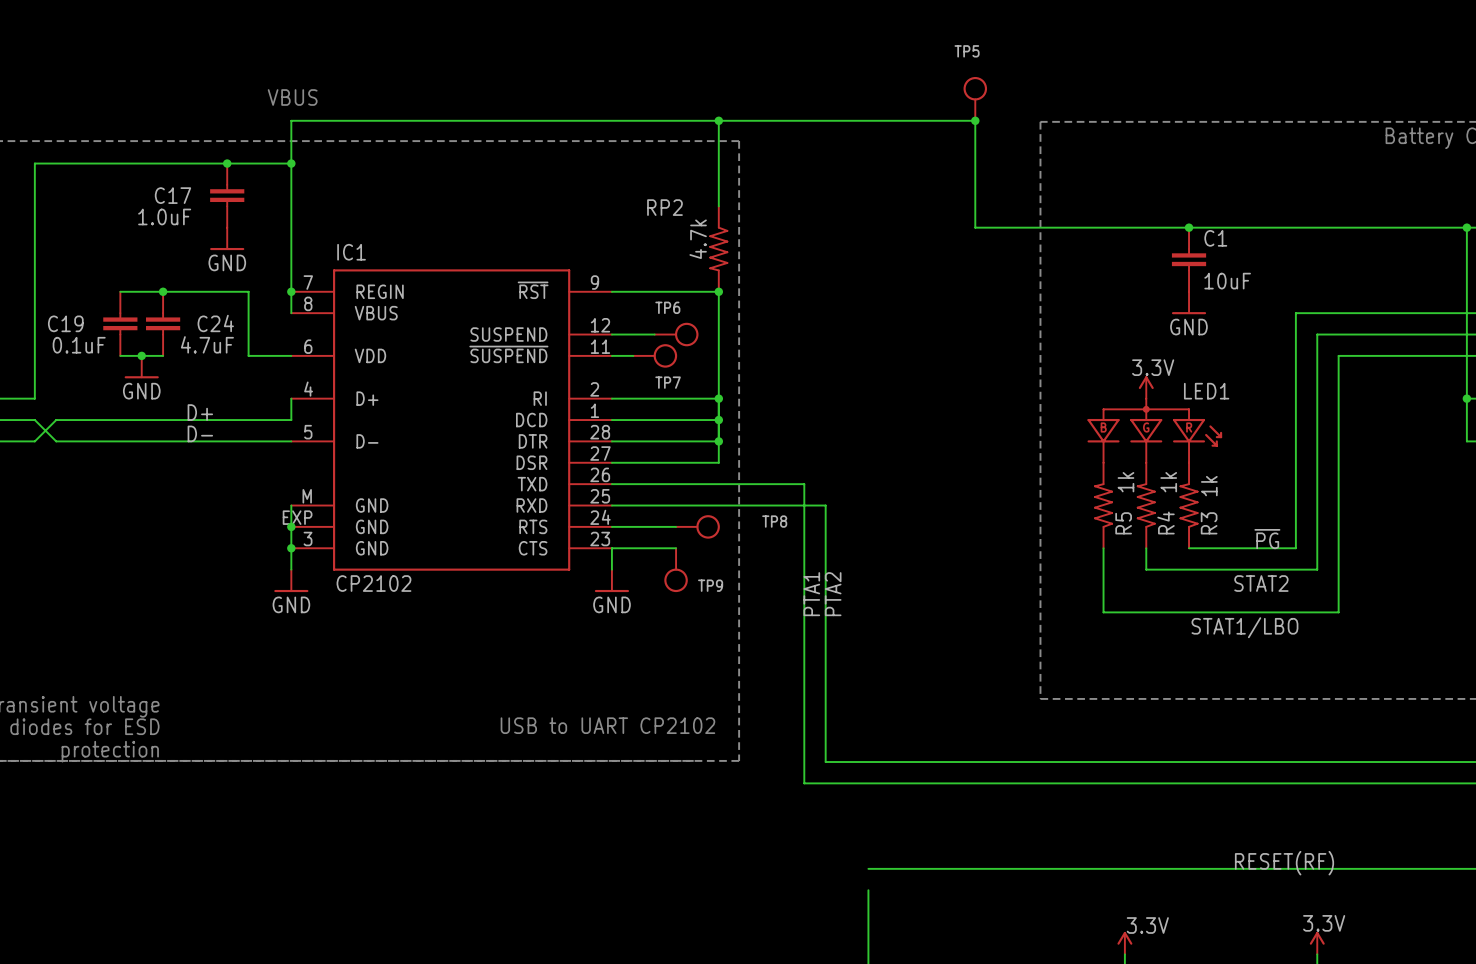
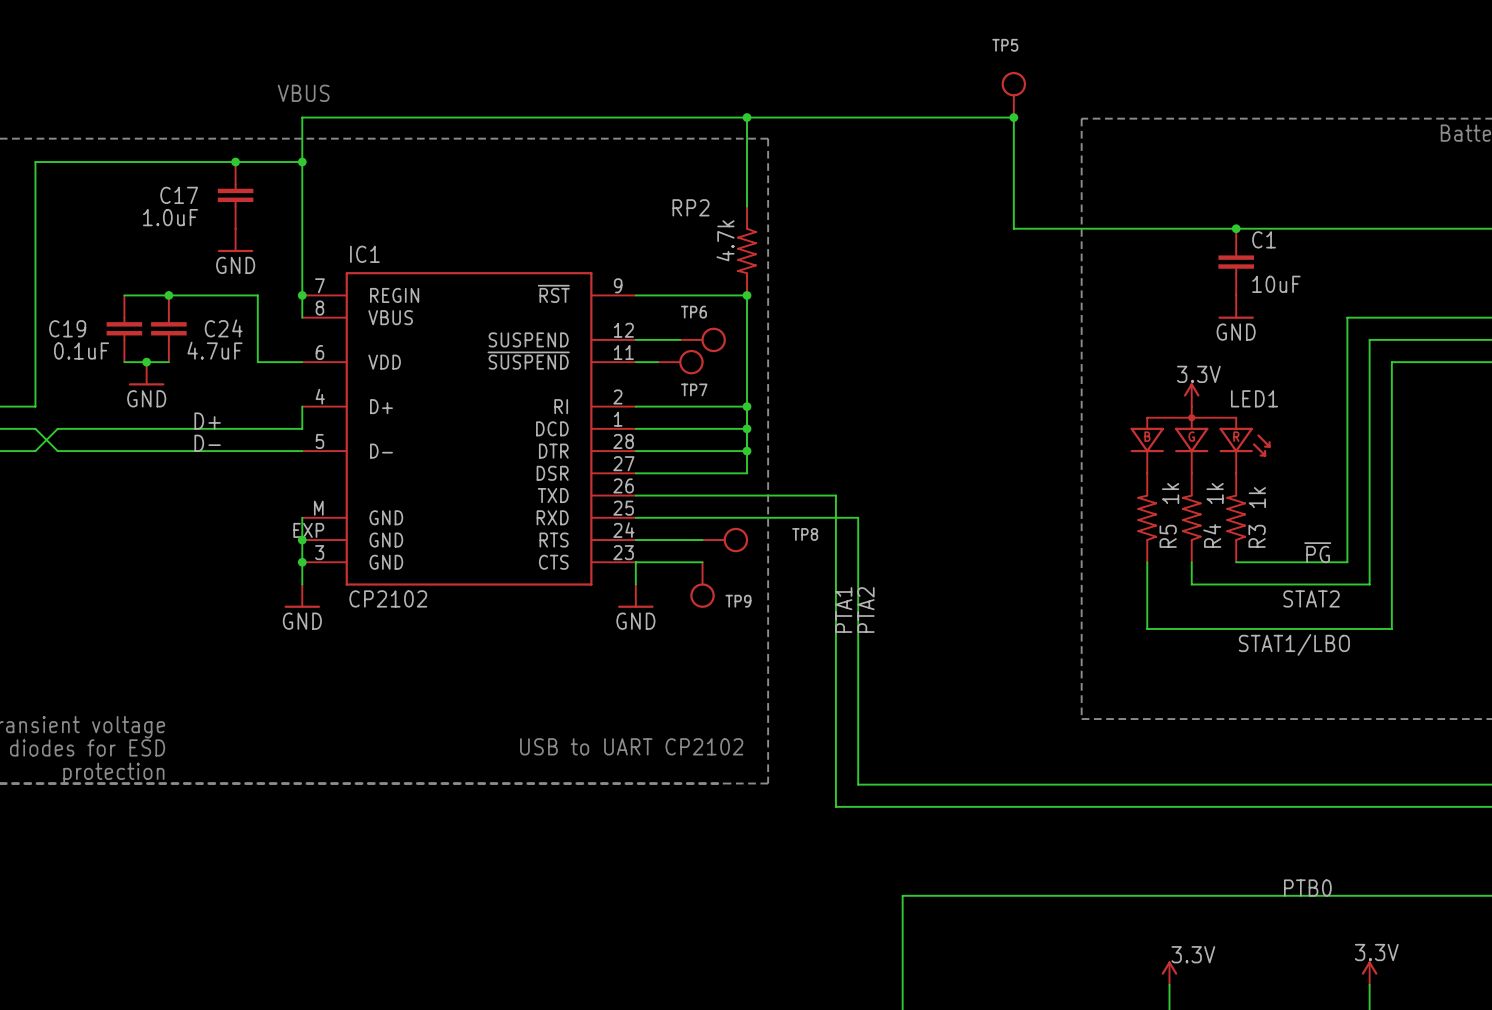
label: RESET(RF) (1284, 863) -> PTB0 (1307, 888)
wire: none -> (902, 895) (902, 918)

